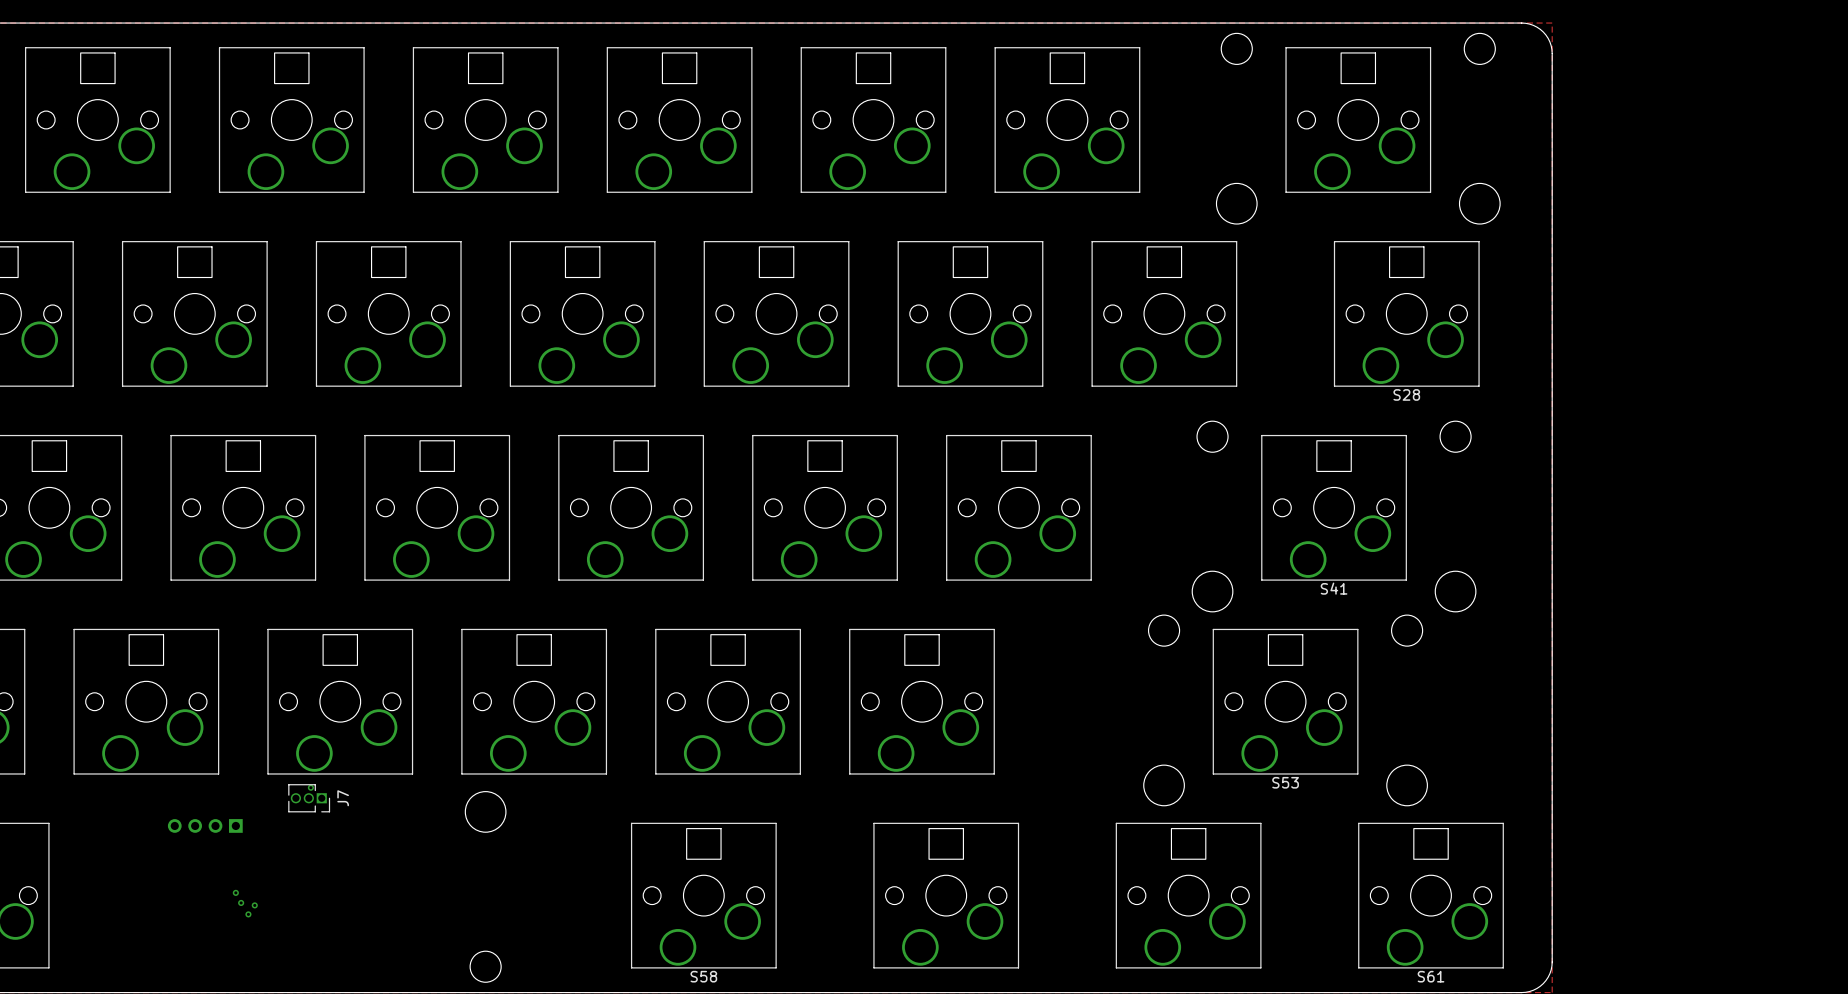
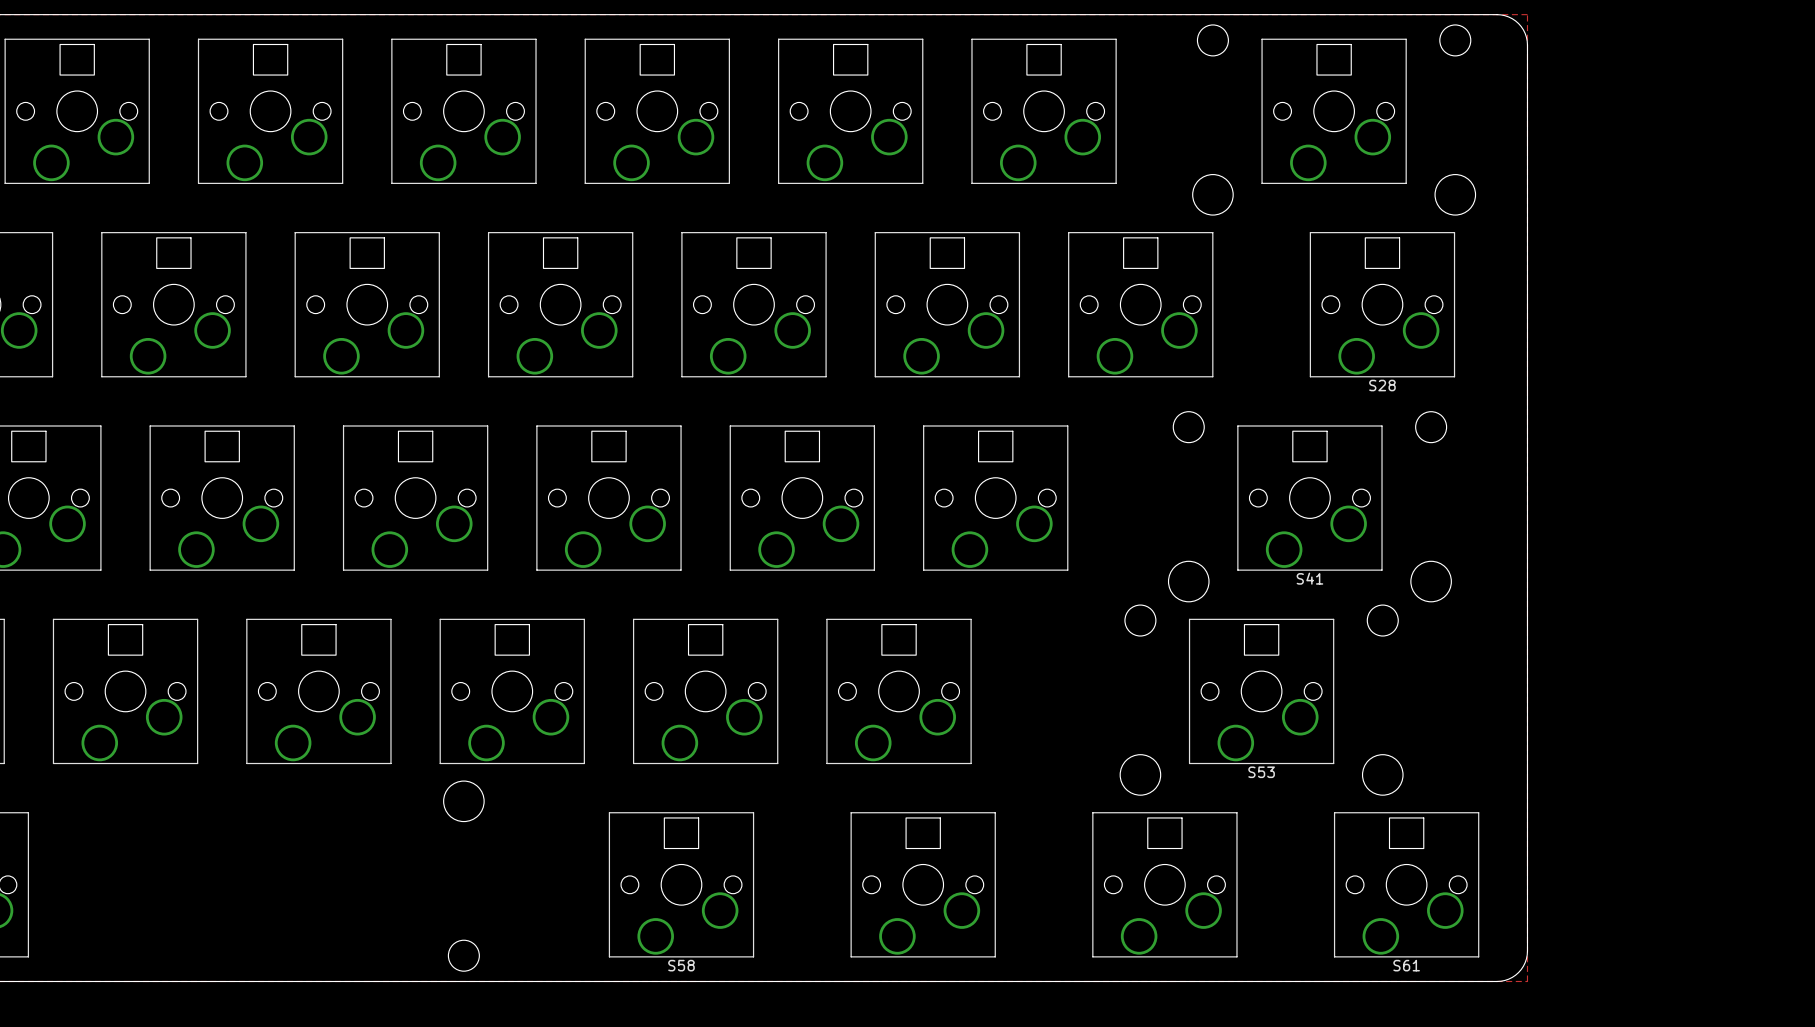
via: (310, 787) -> none
J7: (309, 798) -> none
part: (205, 825) -> none
via: (235, 892) -> none
via: (241, 902) -> none
via: (254, 905) -> none
via: (248, 914) -> none

